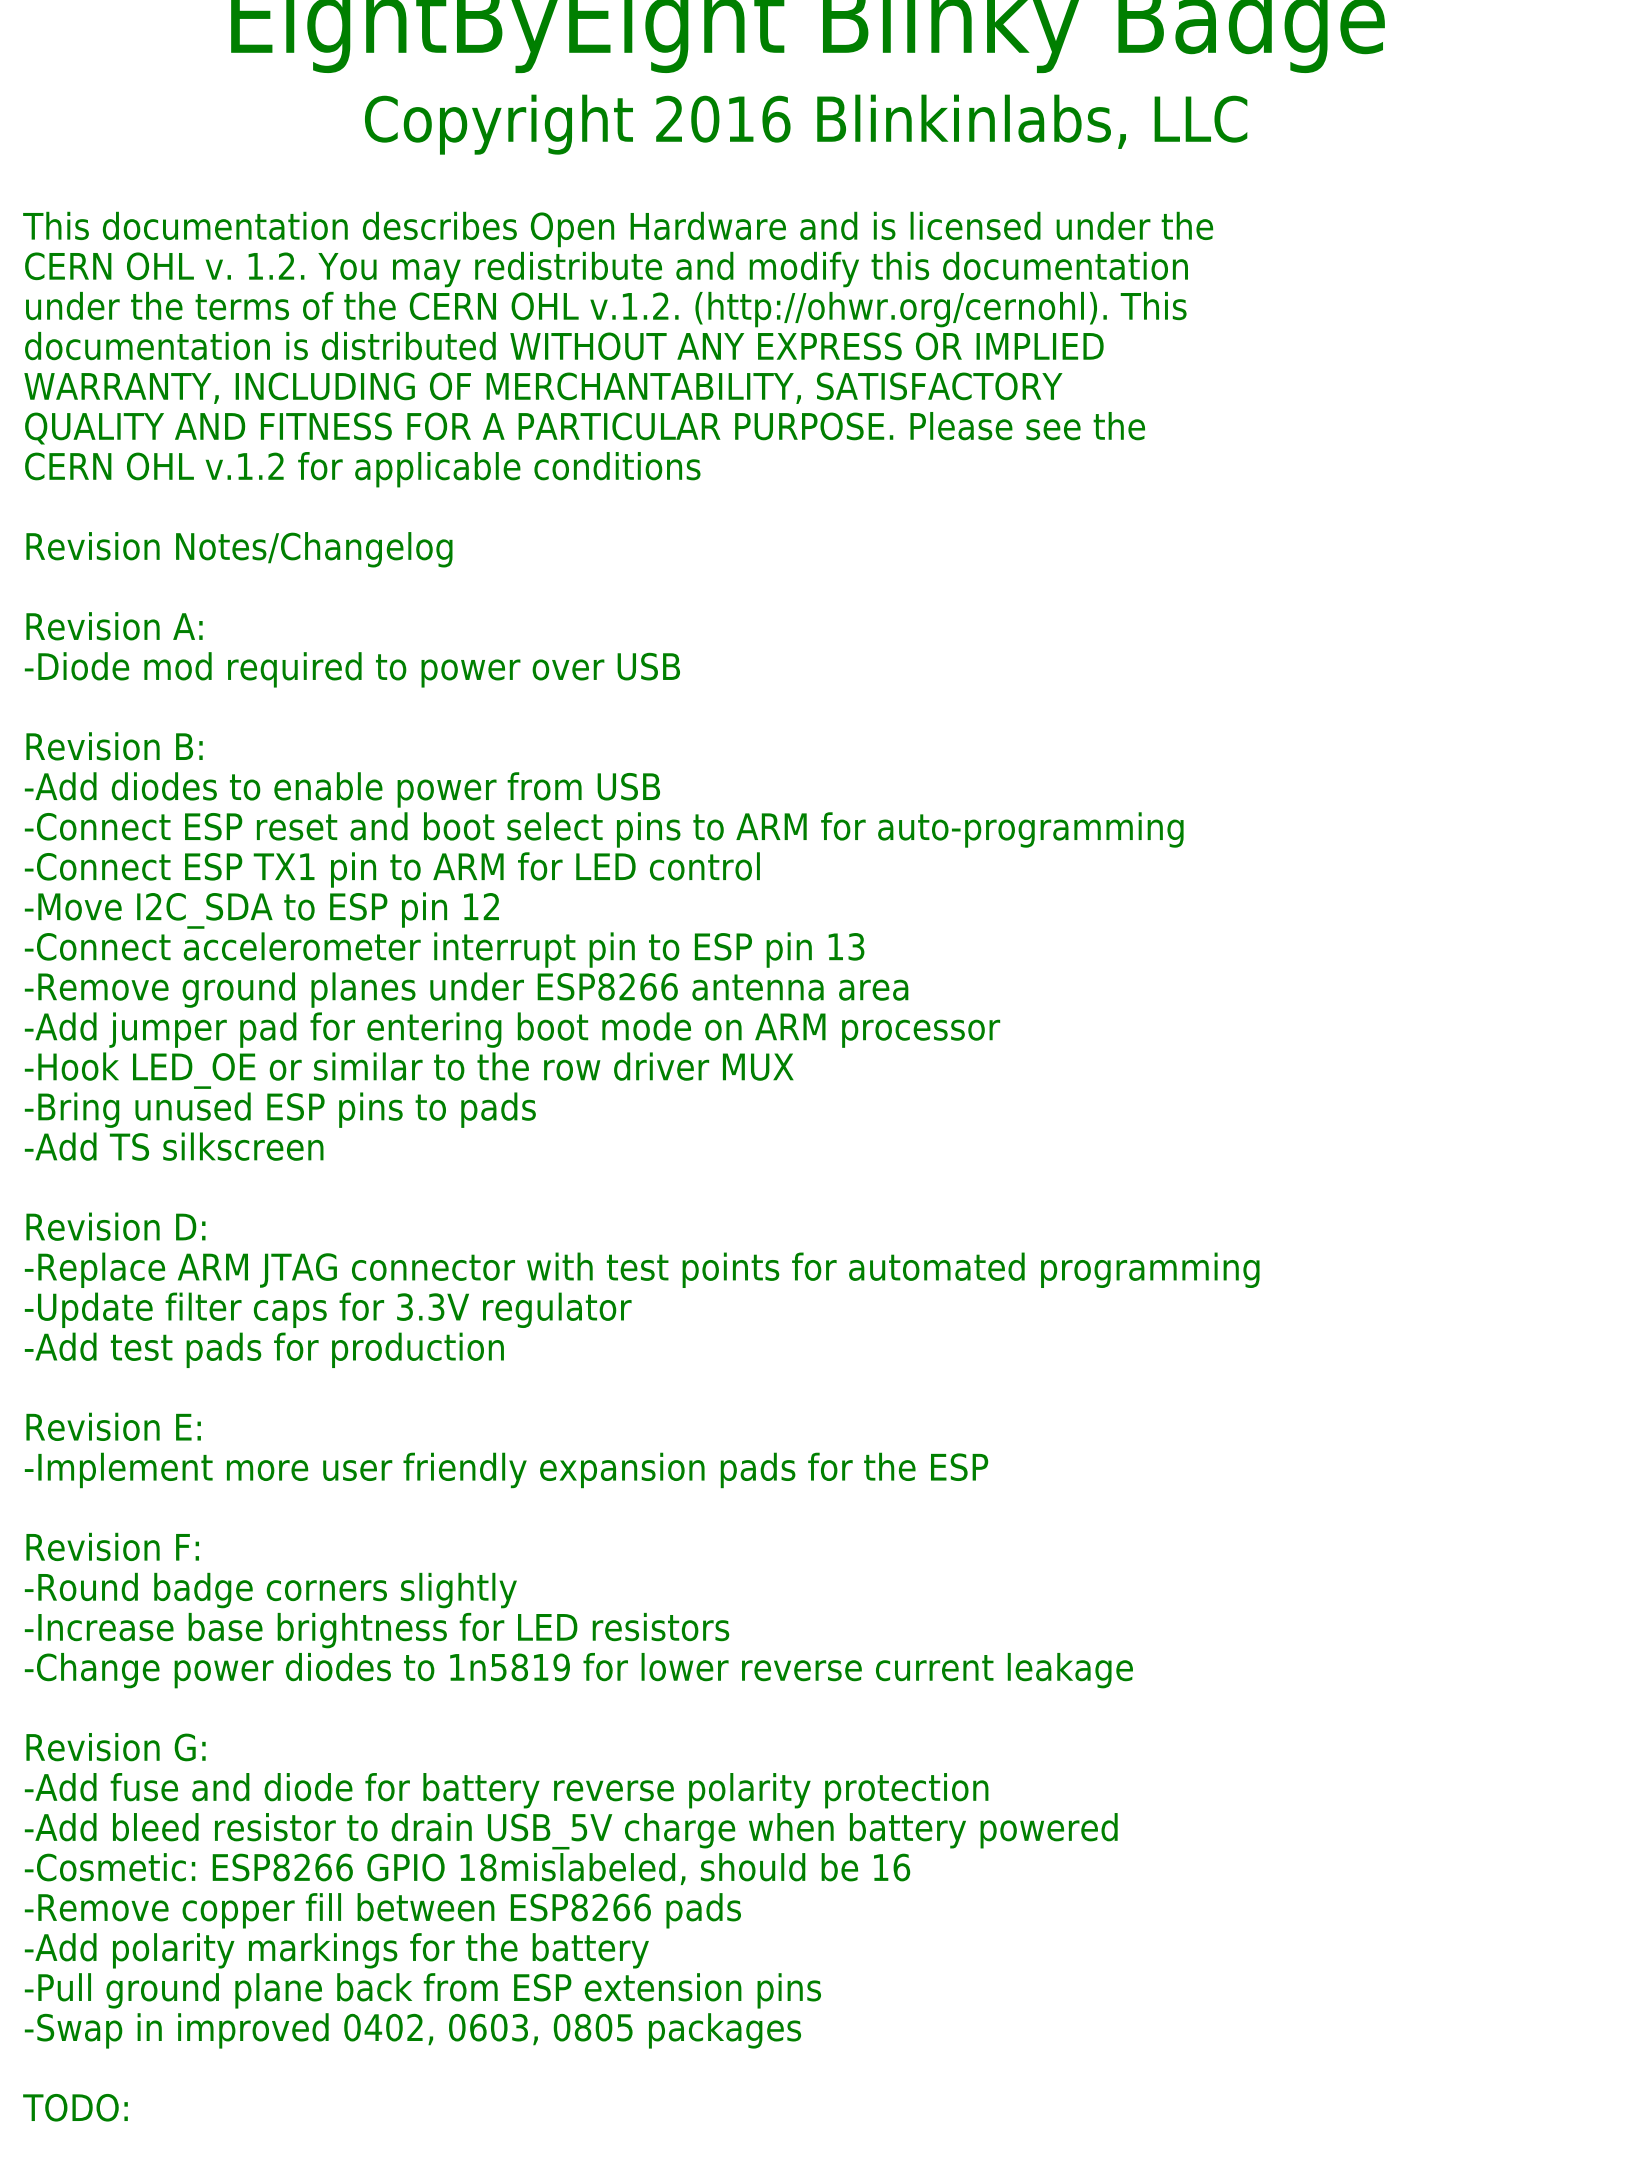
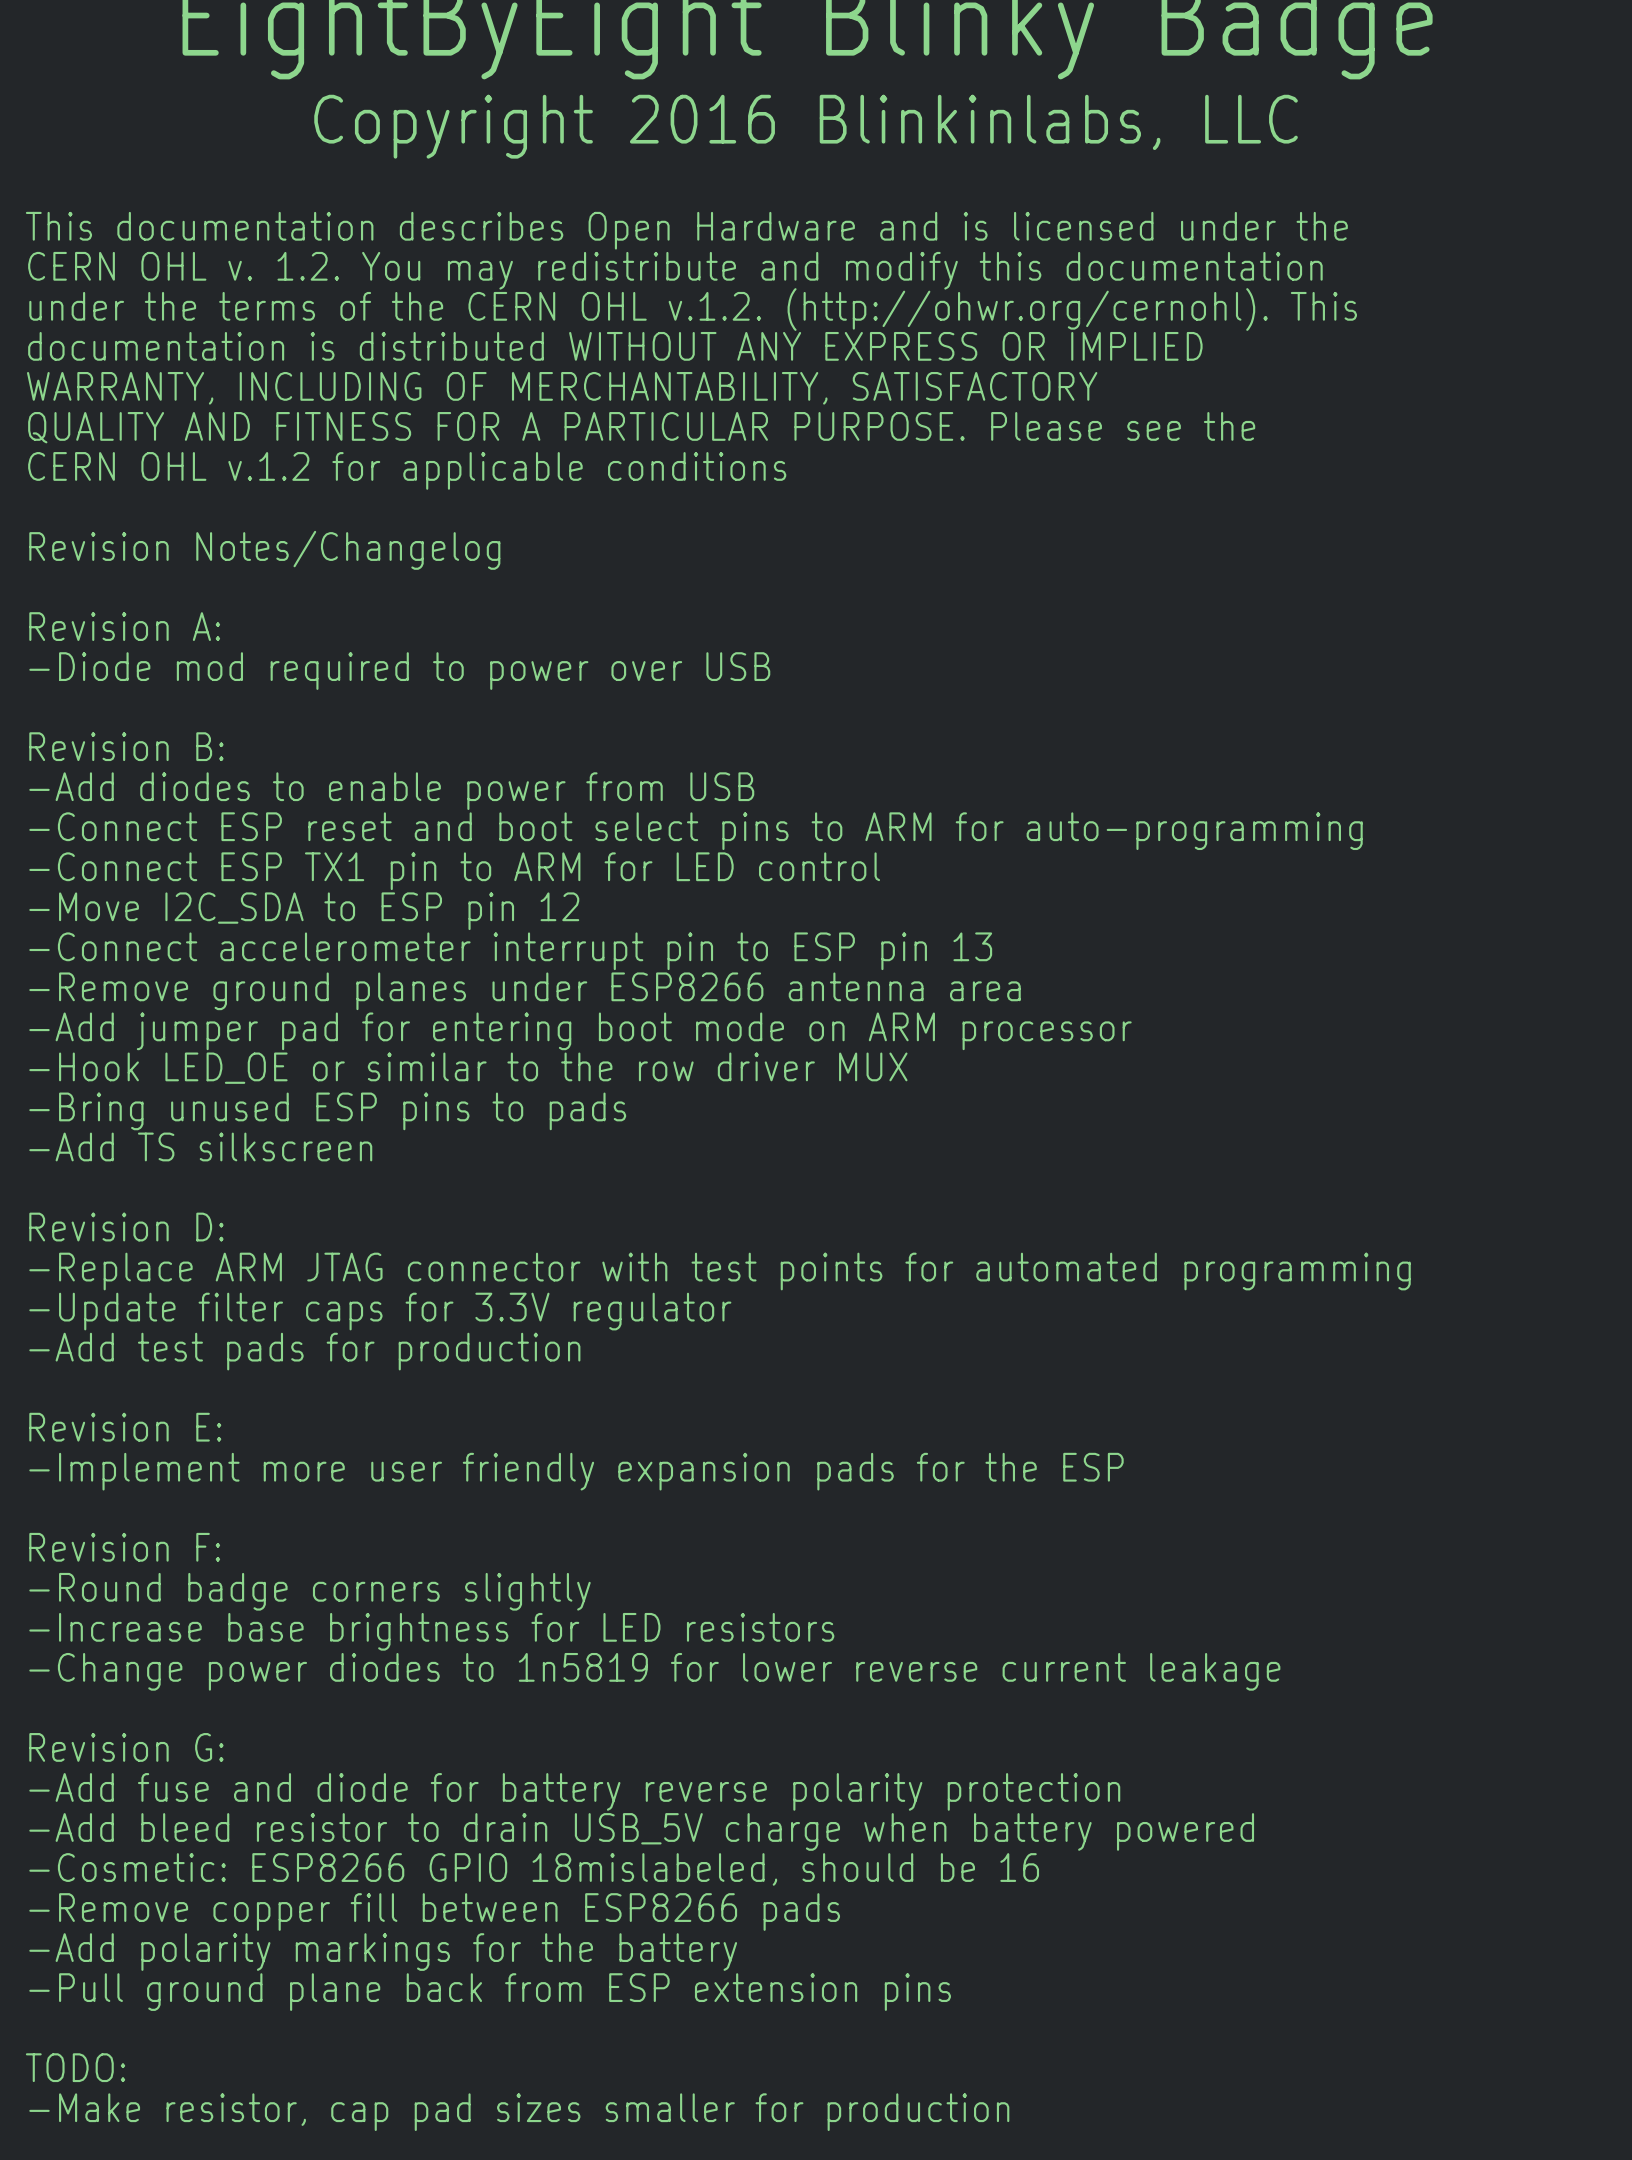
text: -Swap in improved 0402, 0603, 0805 packages (412, 2030) -> none
text: none -> TODO: (75, 2067)
text: TODO: (75, 2107) -> -Make resistor, cap pad sizes smaller for production (519, 2112)

